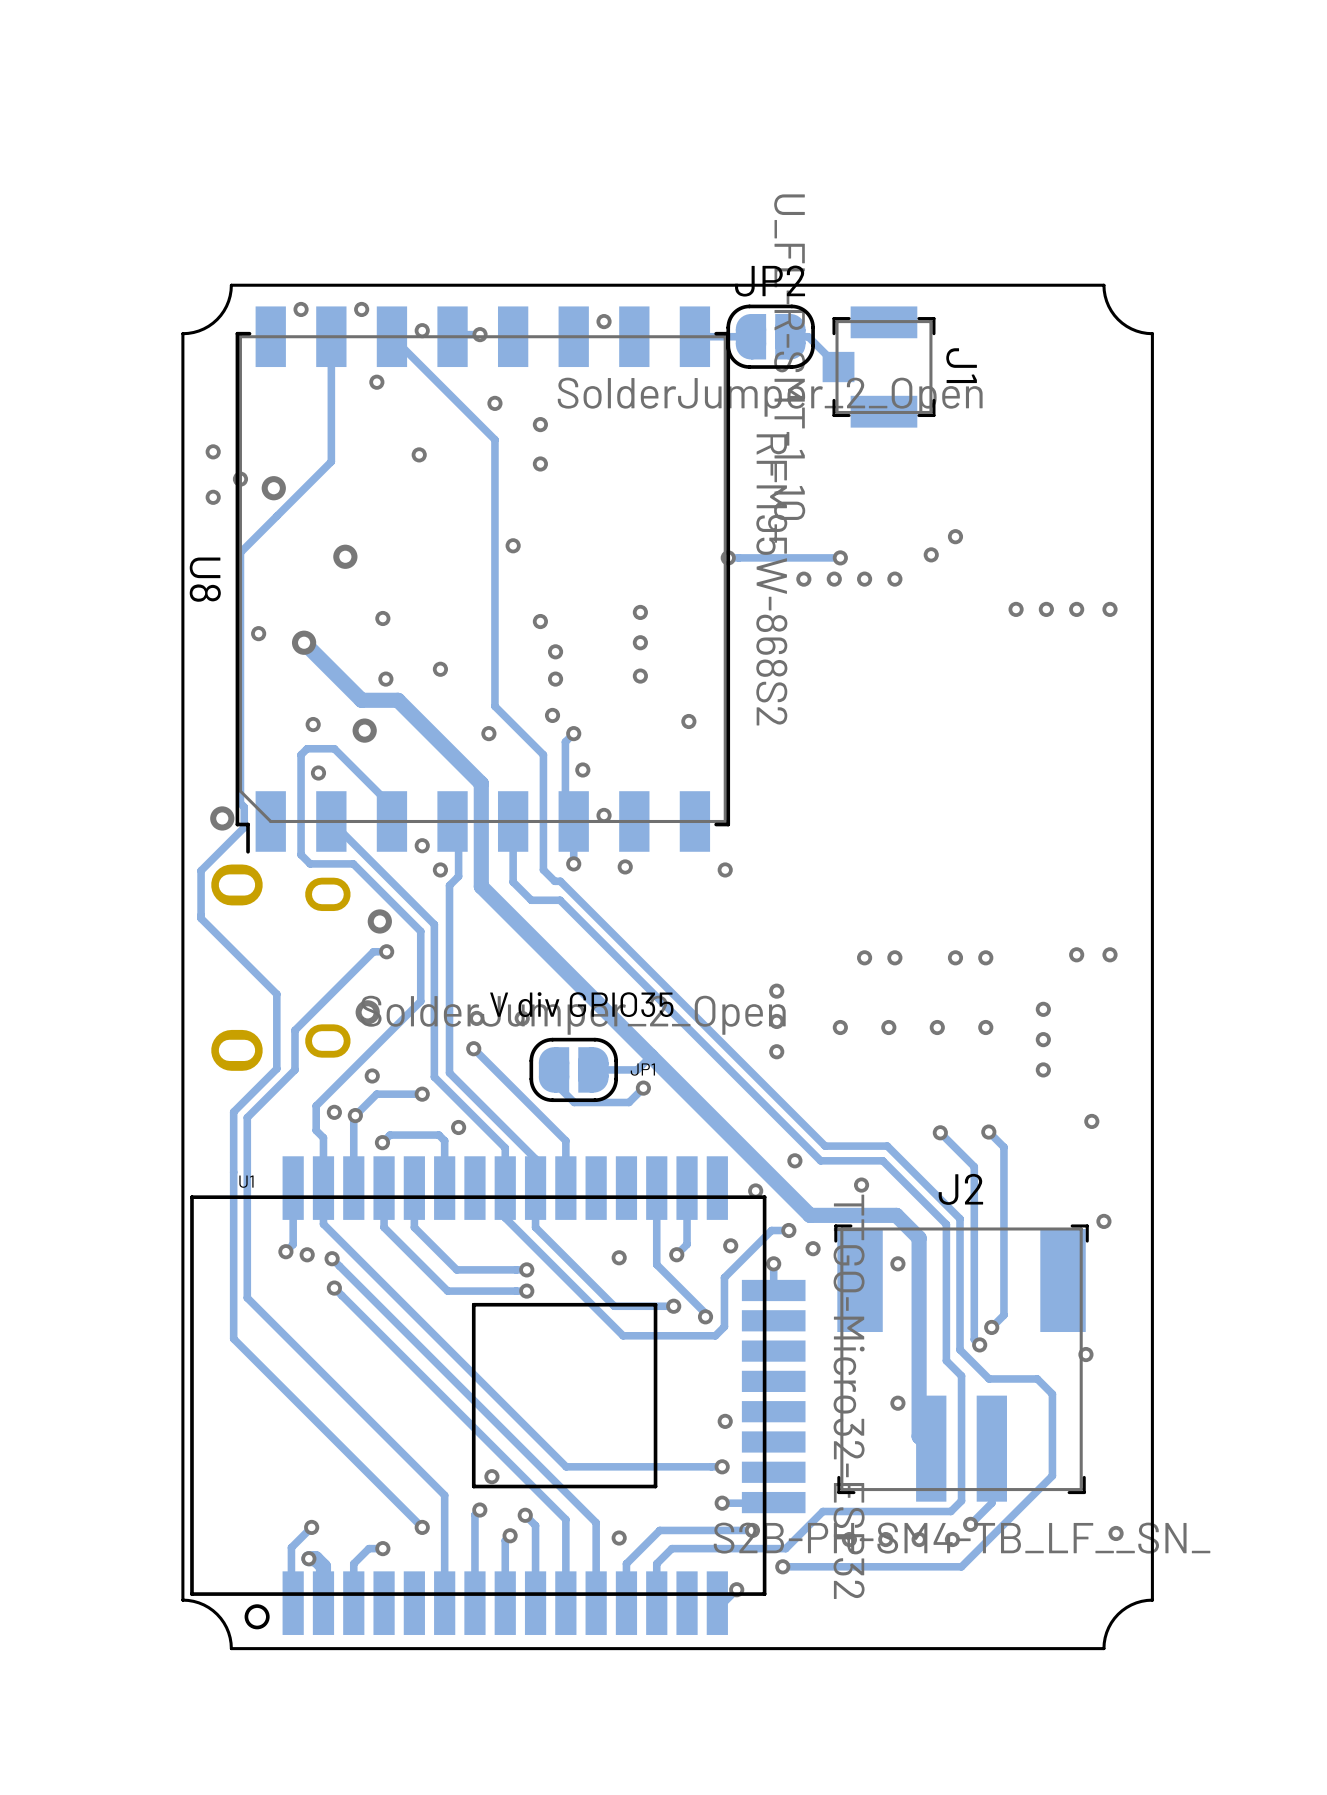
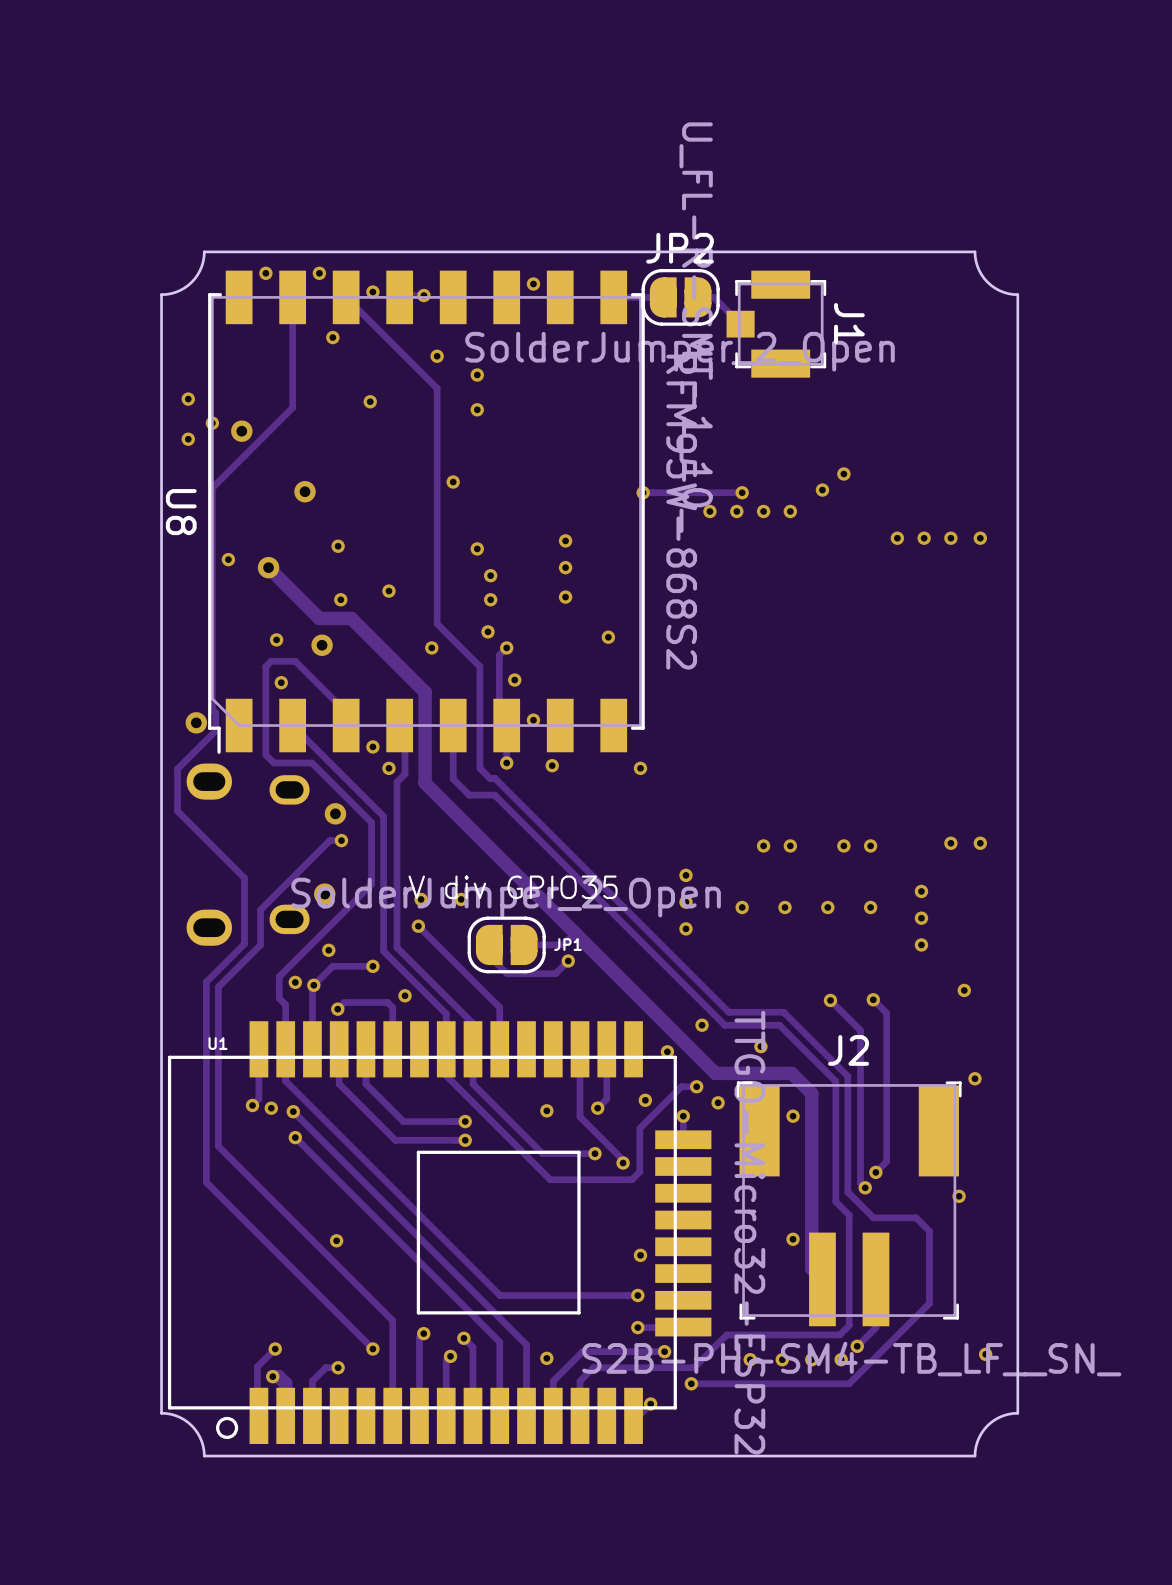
via position: (491, 1476) -> (336, 1240)

